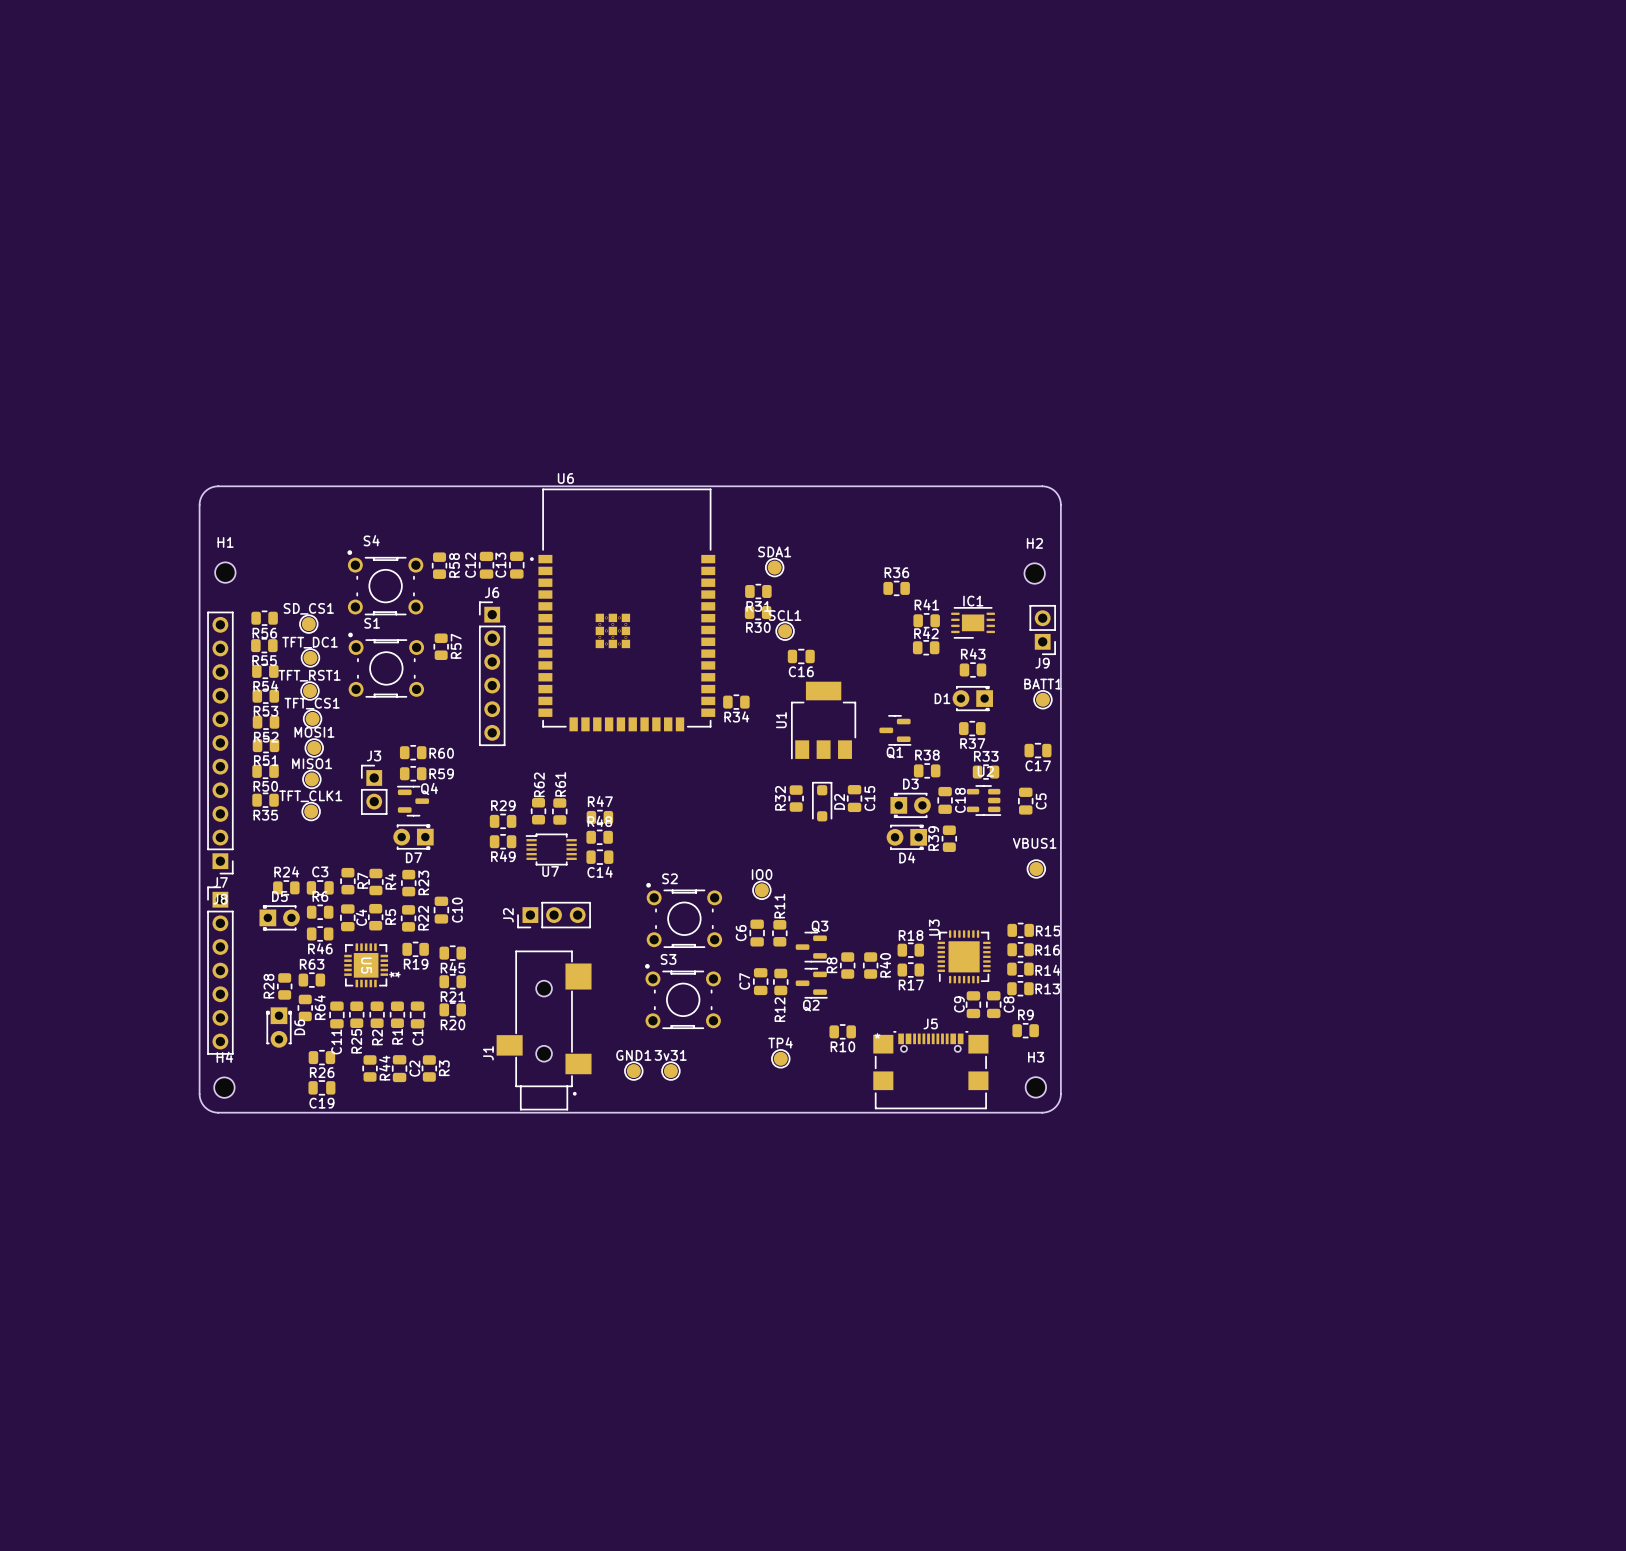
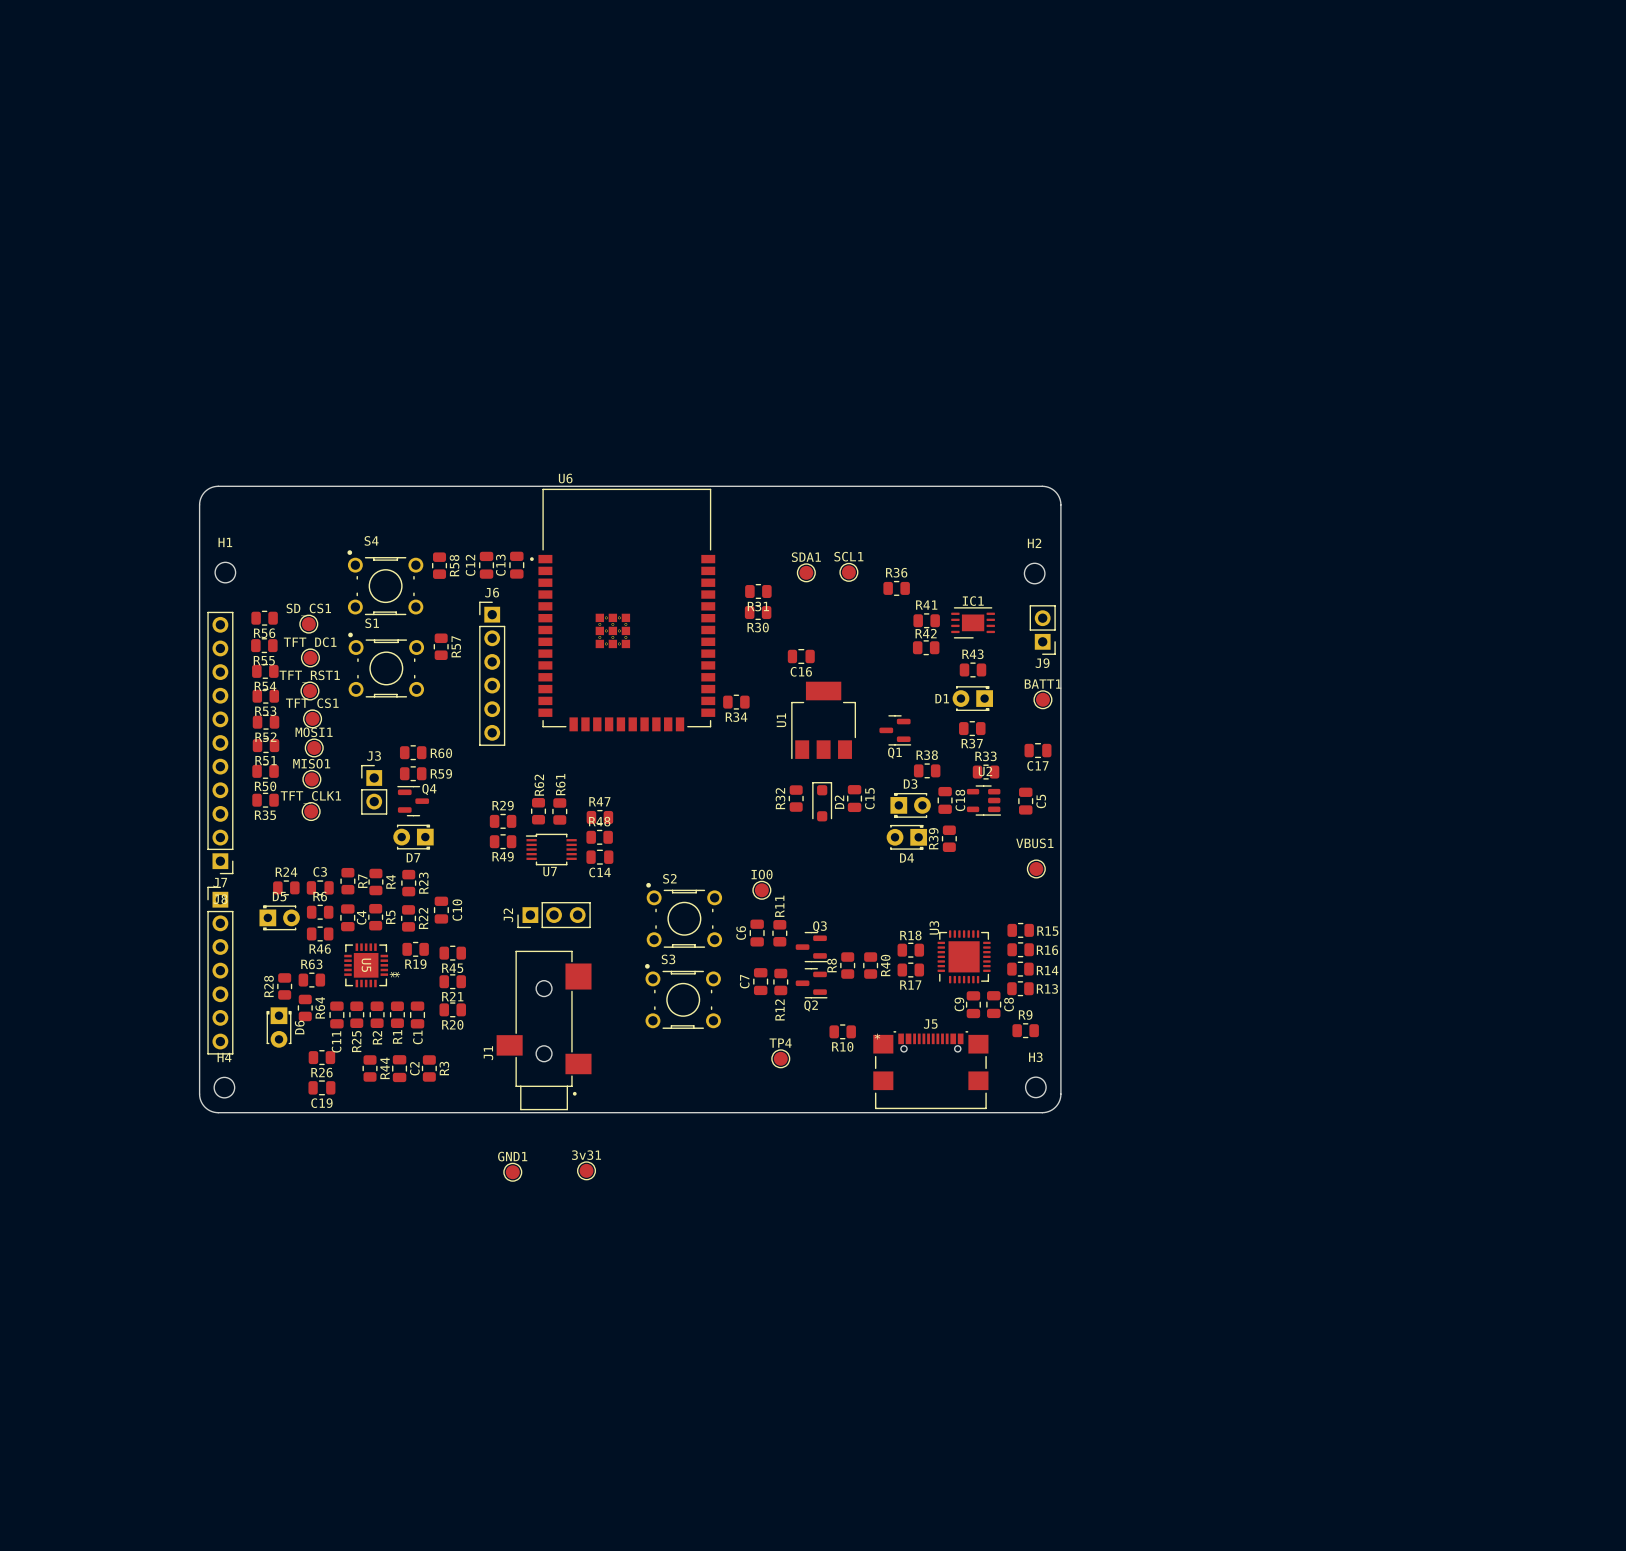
SDA1 position: (774, 567) -> (806, 572)
SCL1 position: (785, 631) -> (848, 572)
GND1 position: (633, 1071) -> (512, 1172)
3v31 position: (670, 1071) -> (586, 1170)

